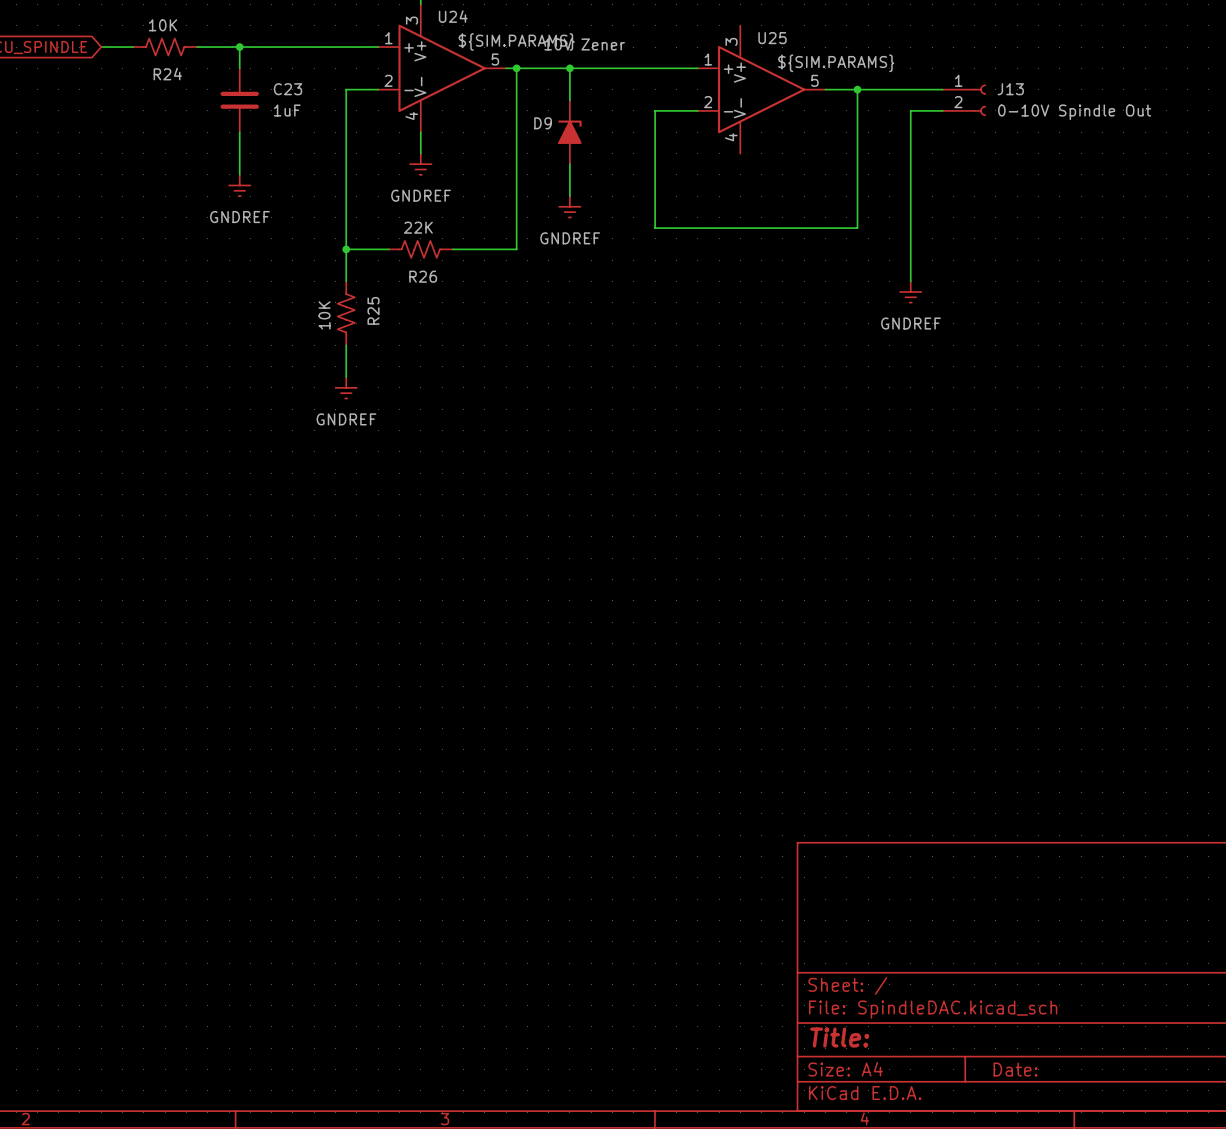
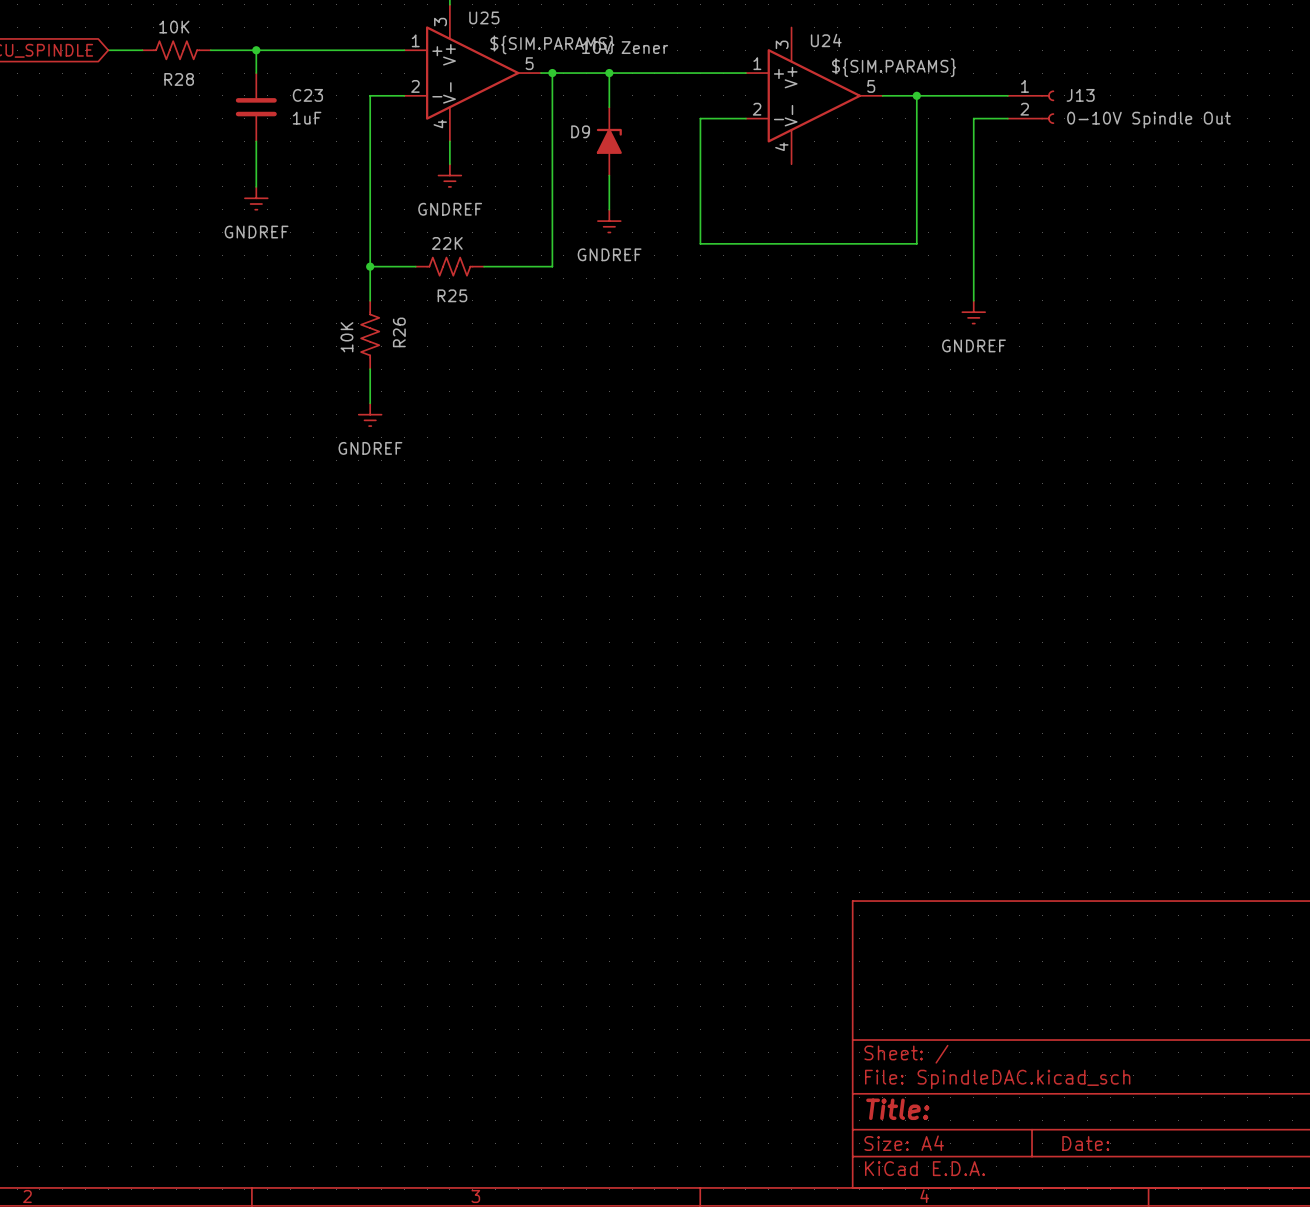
U24 name: U24 (453, 16) -> U25 (484, 17)
U25 name: U25 (772, 38) -> U24 (826, 40)
R24 name: R24 (167, 74) -> R28 (179, 79)
R26 name: R26 (423, 276) -> R25 (452, 295)
R25 name: R25 (373, 310) -> R26 (399, 332)

